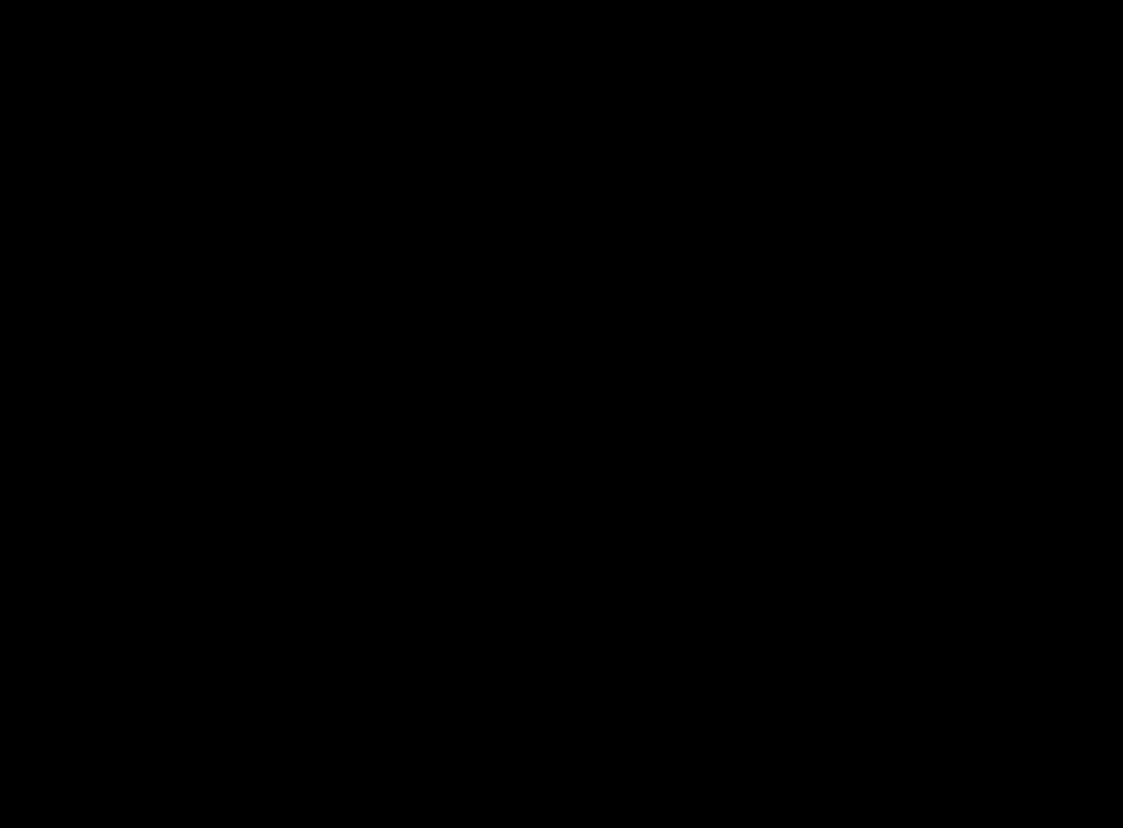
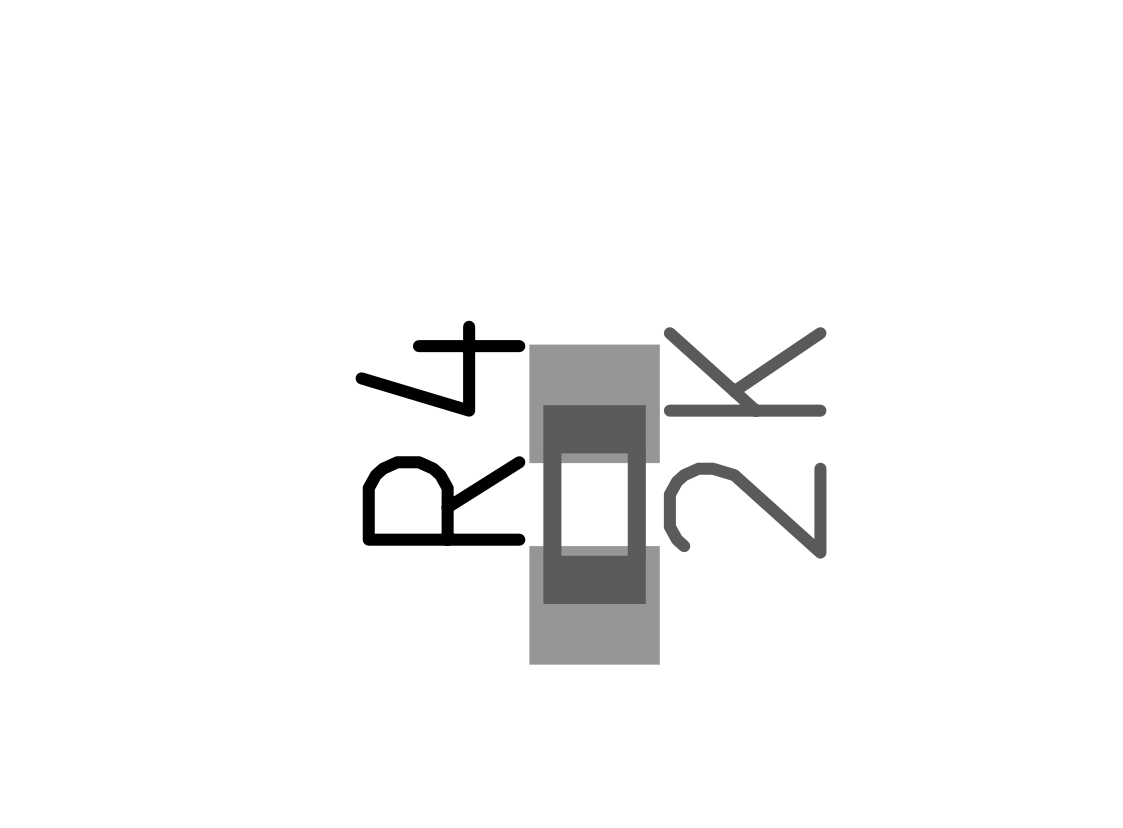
R4: none -> 2K (594, 504)

